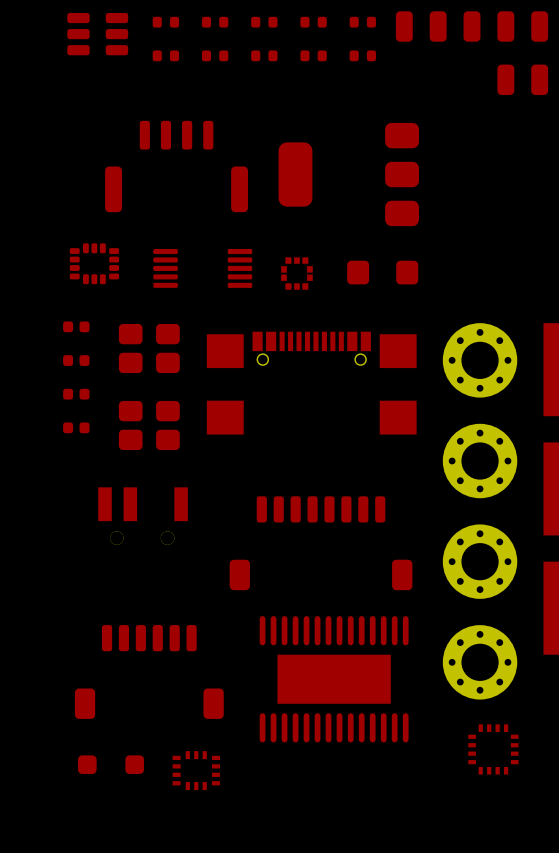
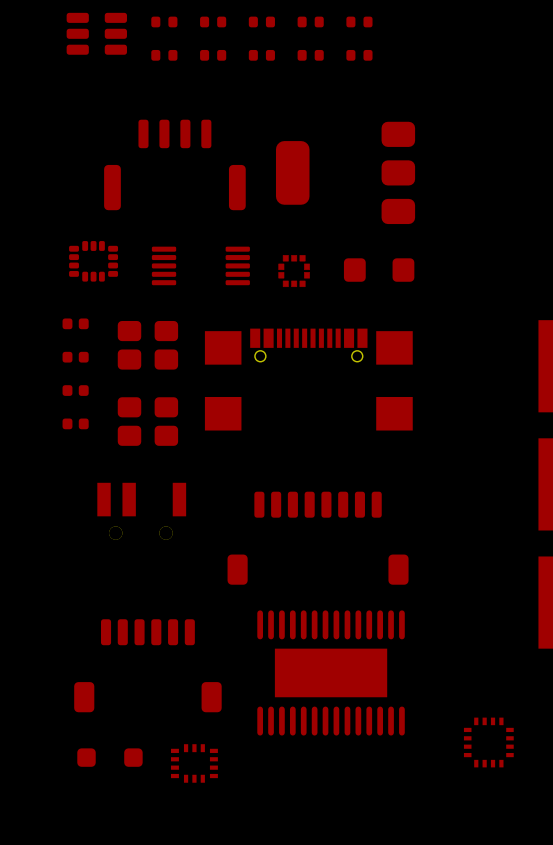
part: (404, 26) -> none
part: (438, 26) -> none
part: (472, 26) -> none
part: (505, 26) -> none
part: (539, 26) -> none
part: (505, 79) -> none
part: (539, 79) -> none
part: (480, 360) -> none
part: (480, 461) -> none
part: (480, 561) -> none
part: (480, 662) -> none

